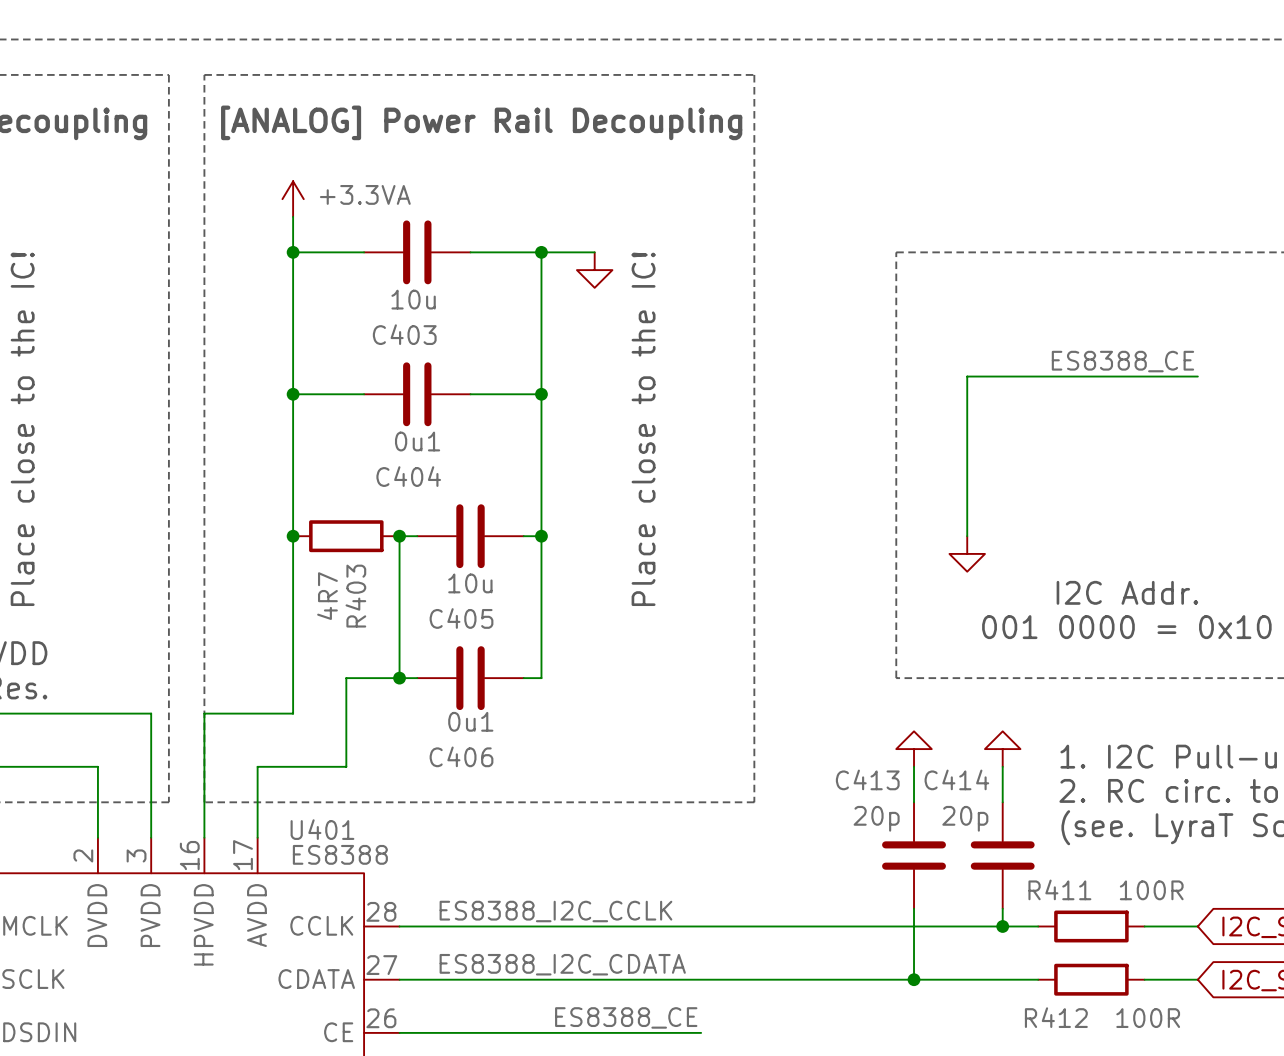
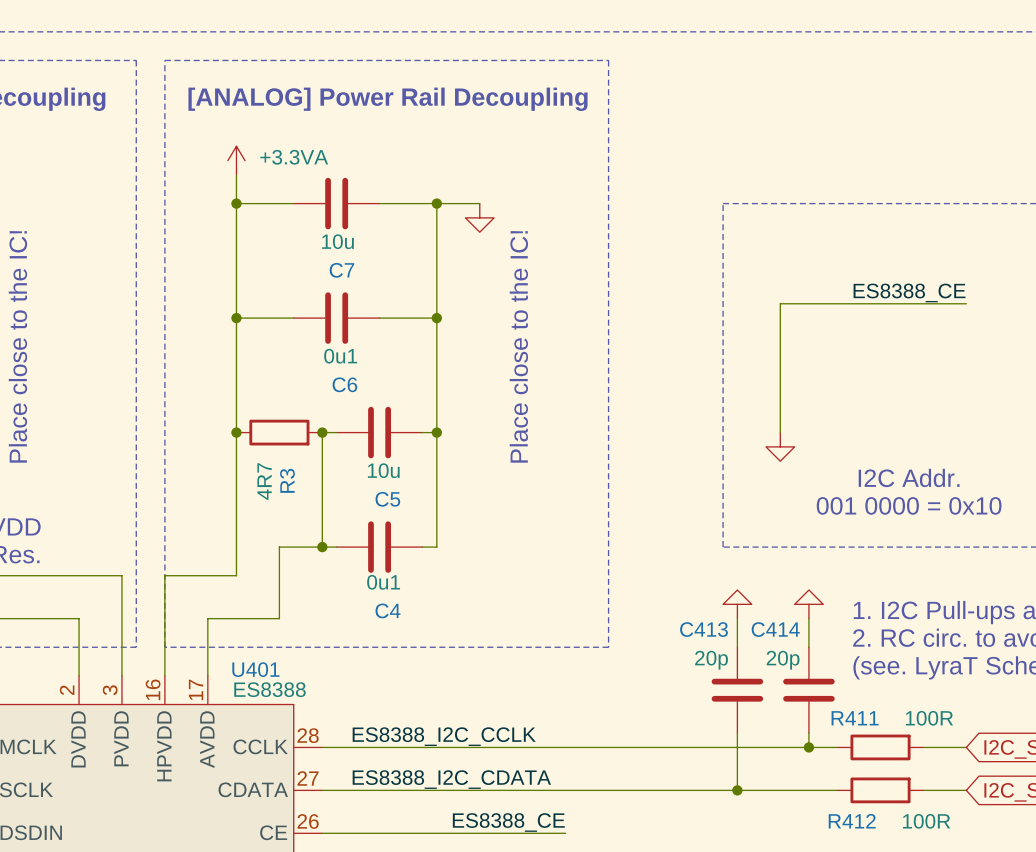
C403 name: C403 (404, 334) -> C7 (341, 270)
C404 name: C404 (408, 476) -> C6 (344, 384)
R403 name: R403 (355, 596) -> R3 (287, 480)
C405 name: C405 (461, 618) -> C5 (387, 499)
C406 name: C406 (461, 756) -> C4 (387, 610)

